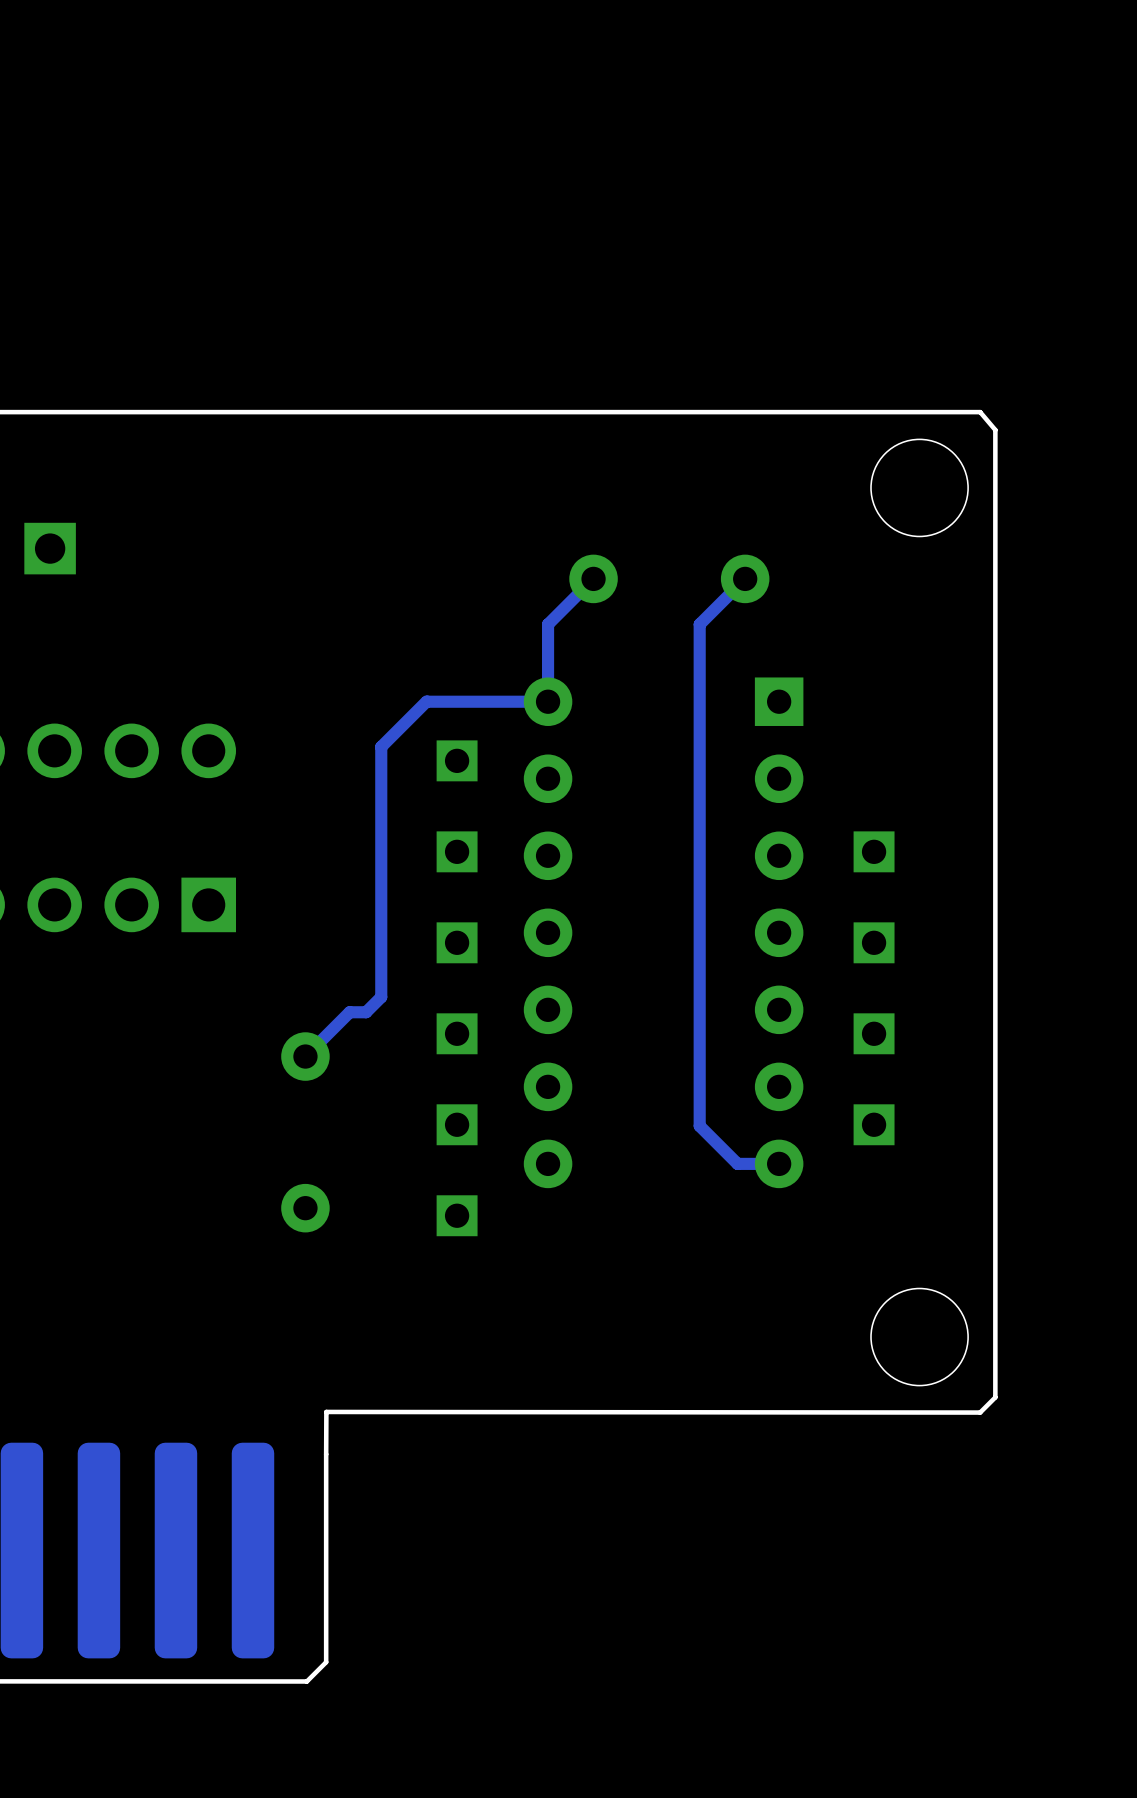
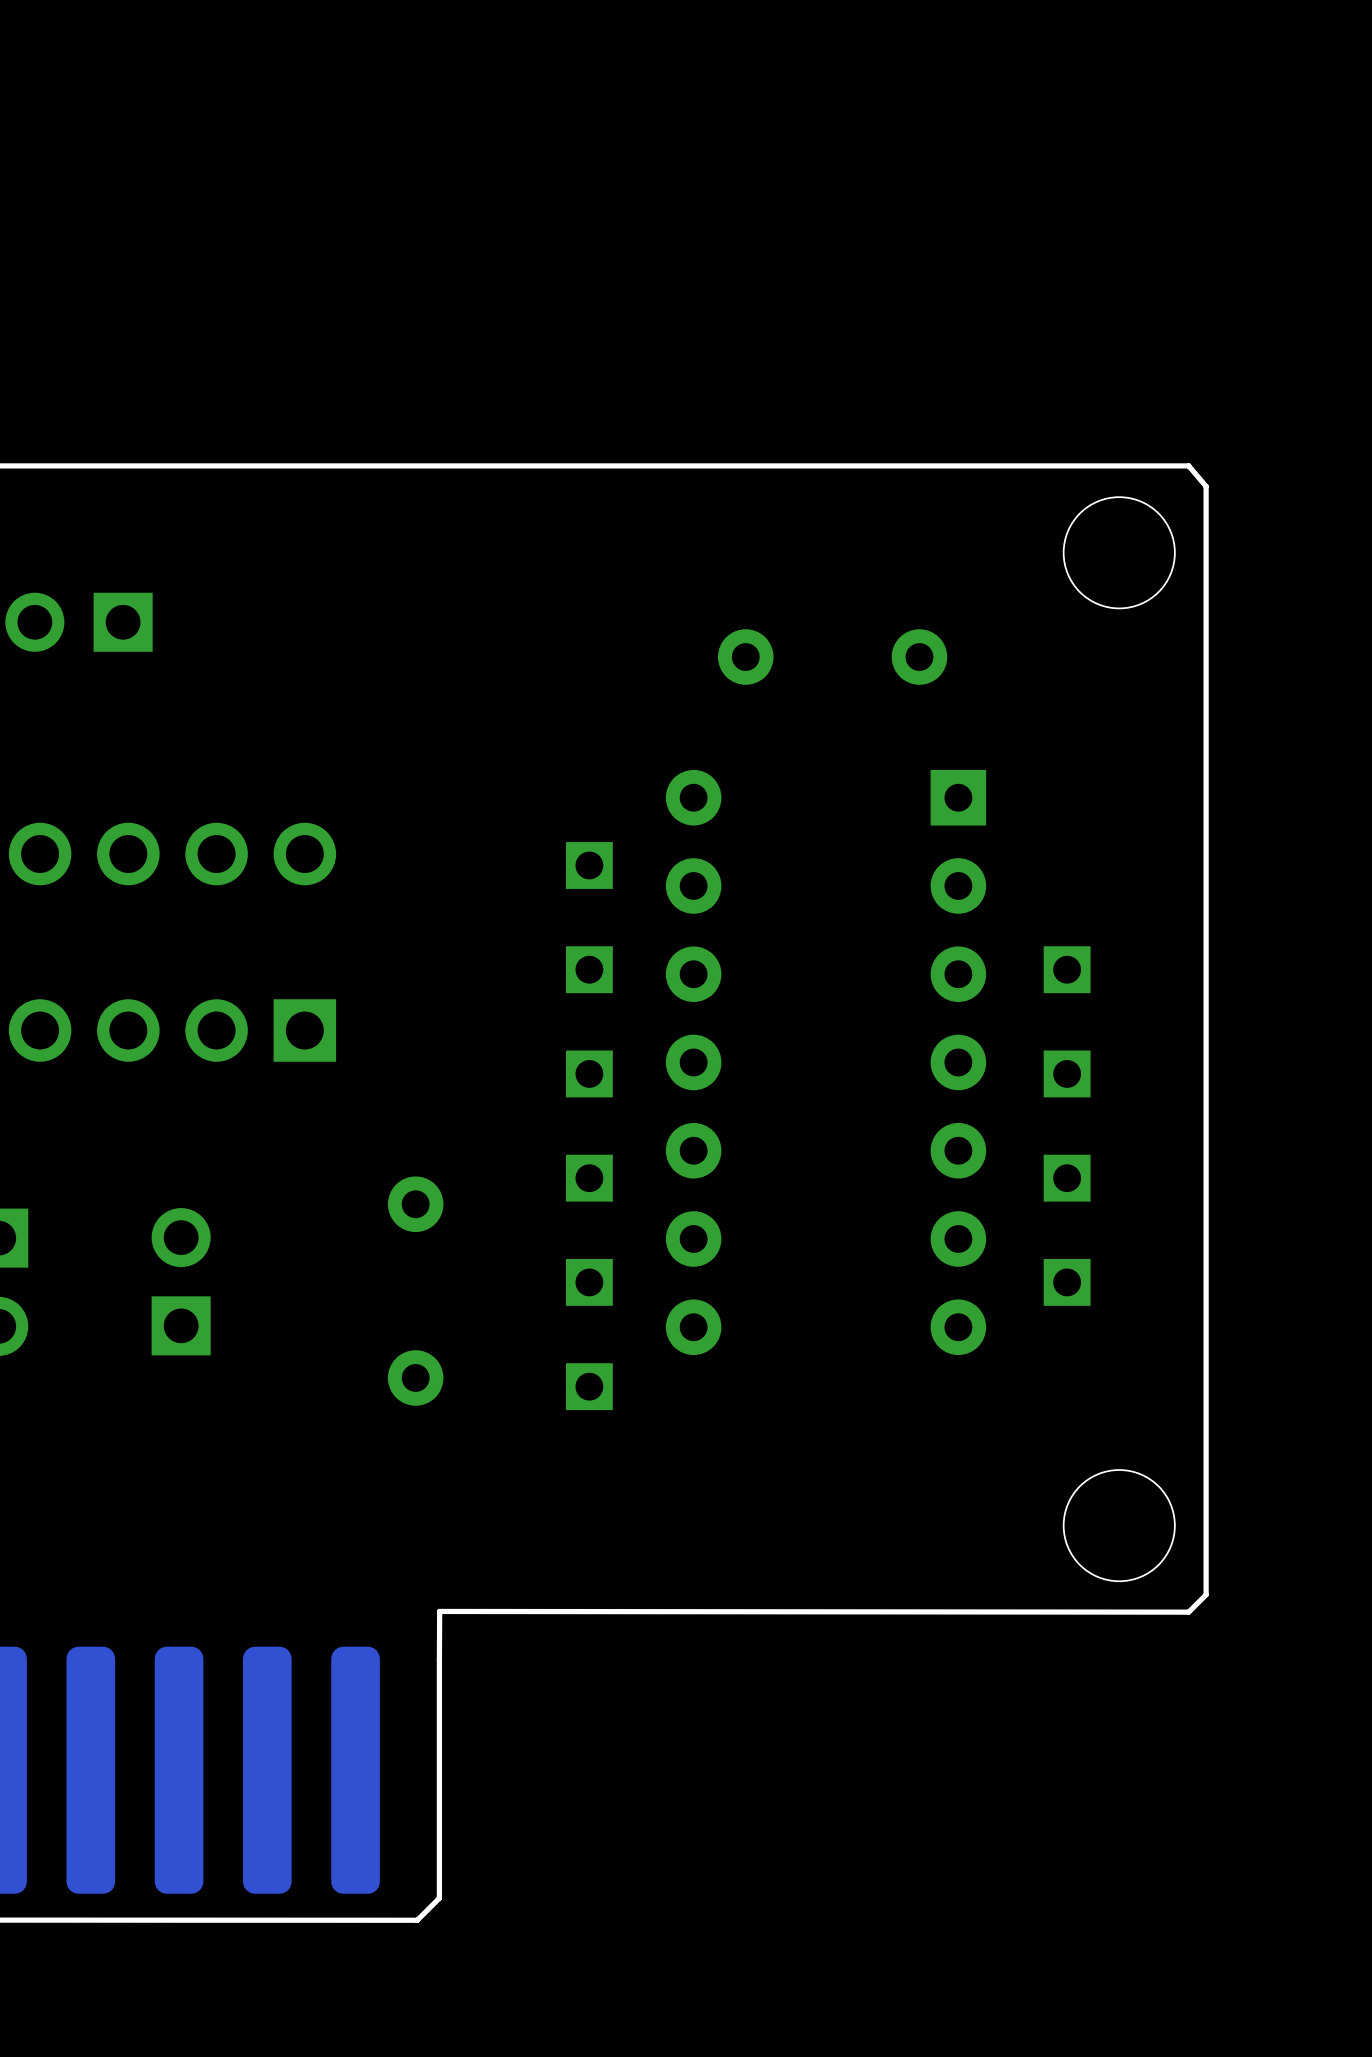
track: (593, 578) (548, 624) (548, 701) (427, 701) -> none
track: (745, 578) (699, 624) (699, 1125) (737, 1163) (779, 1163) -> none
track: (426, 701) (381, 746) (381, 997) (366, 1012) (349, 1012) (305, 1056) -> none
part: none -> (181, 1281)

